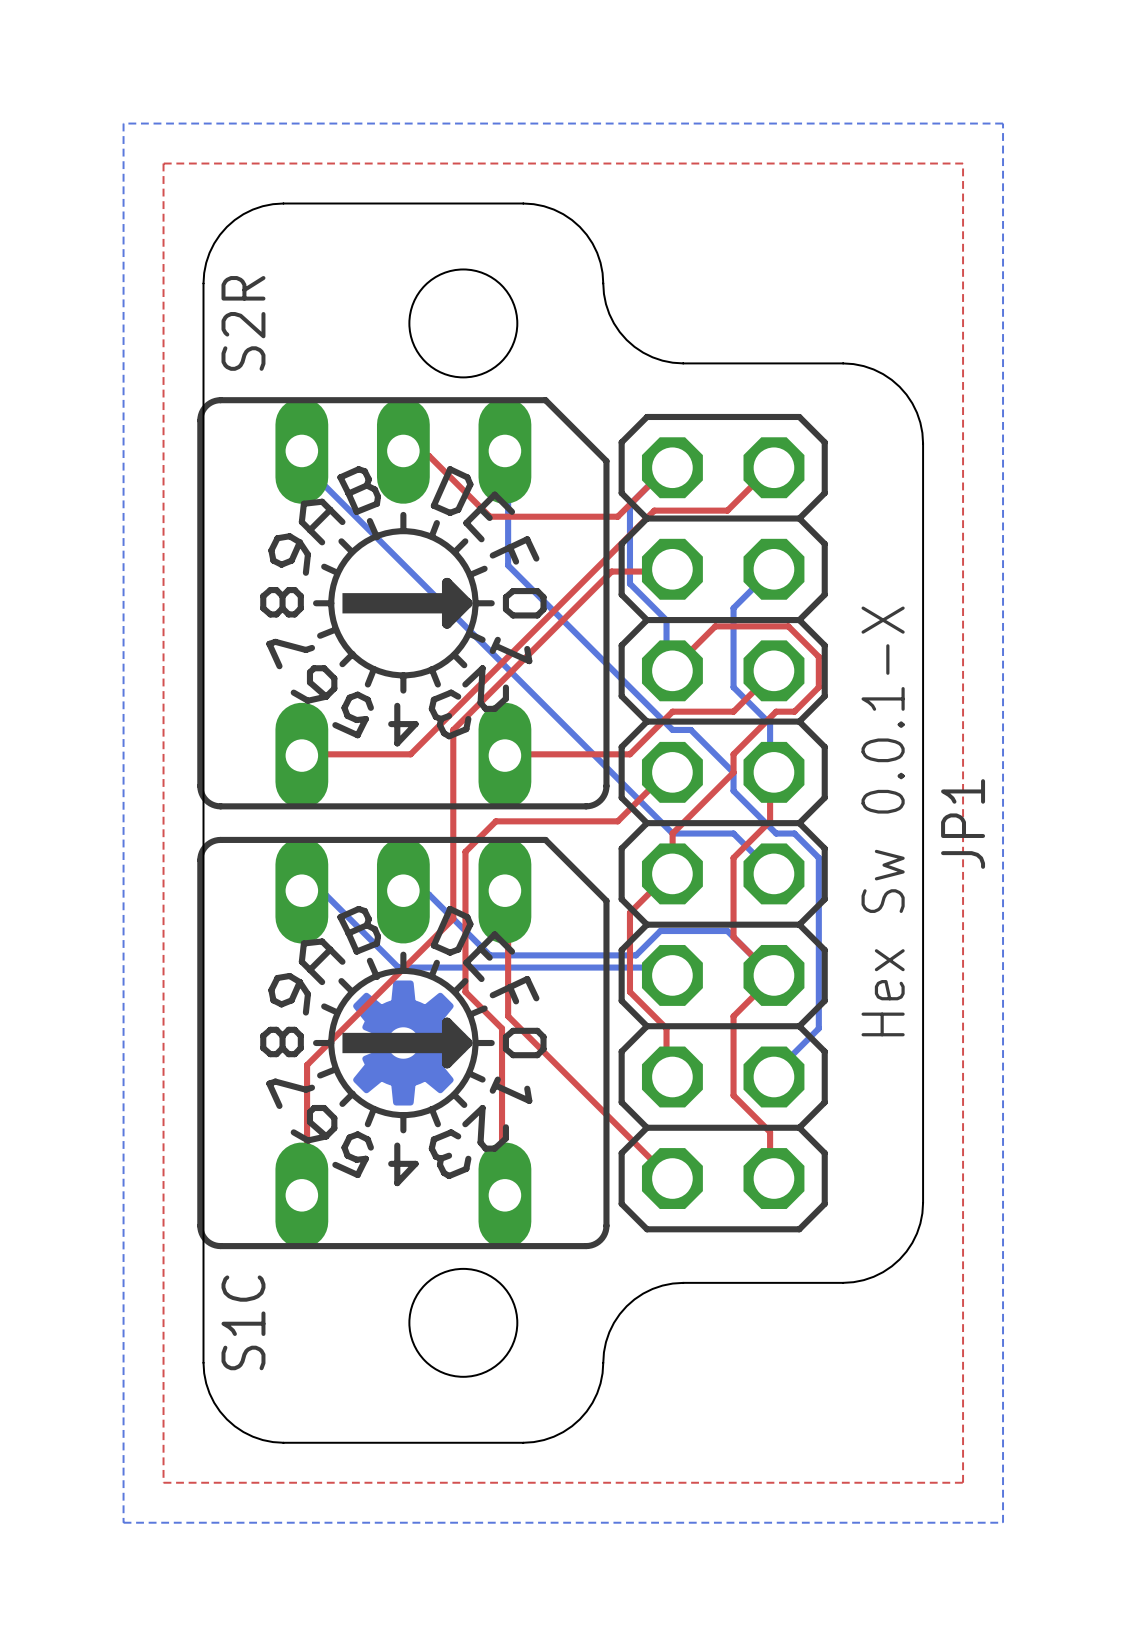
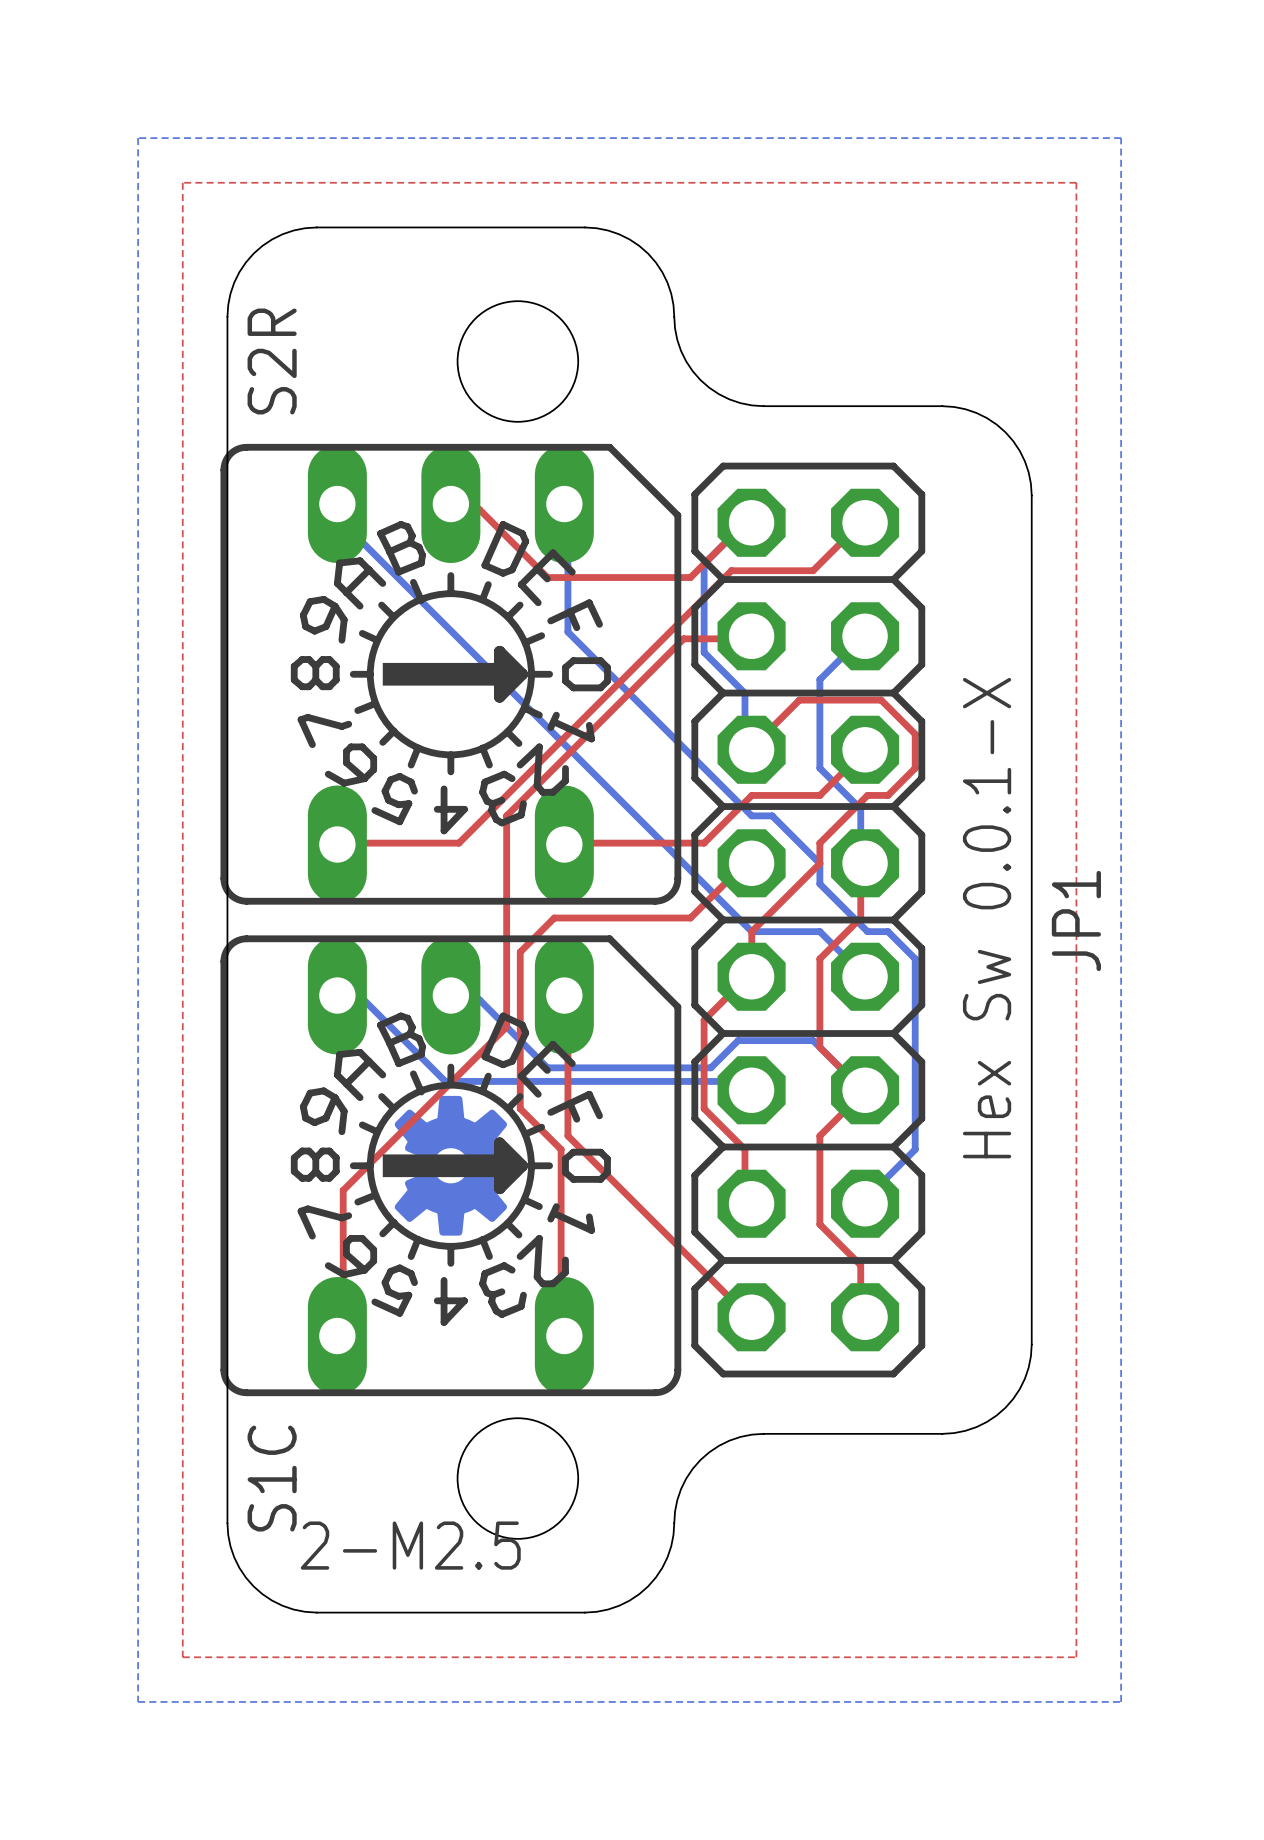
text: none -> 2-M2.5 (410, 1545)

